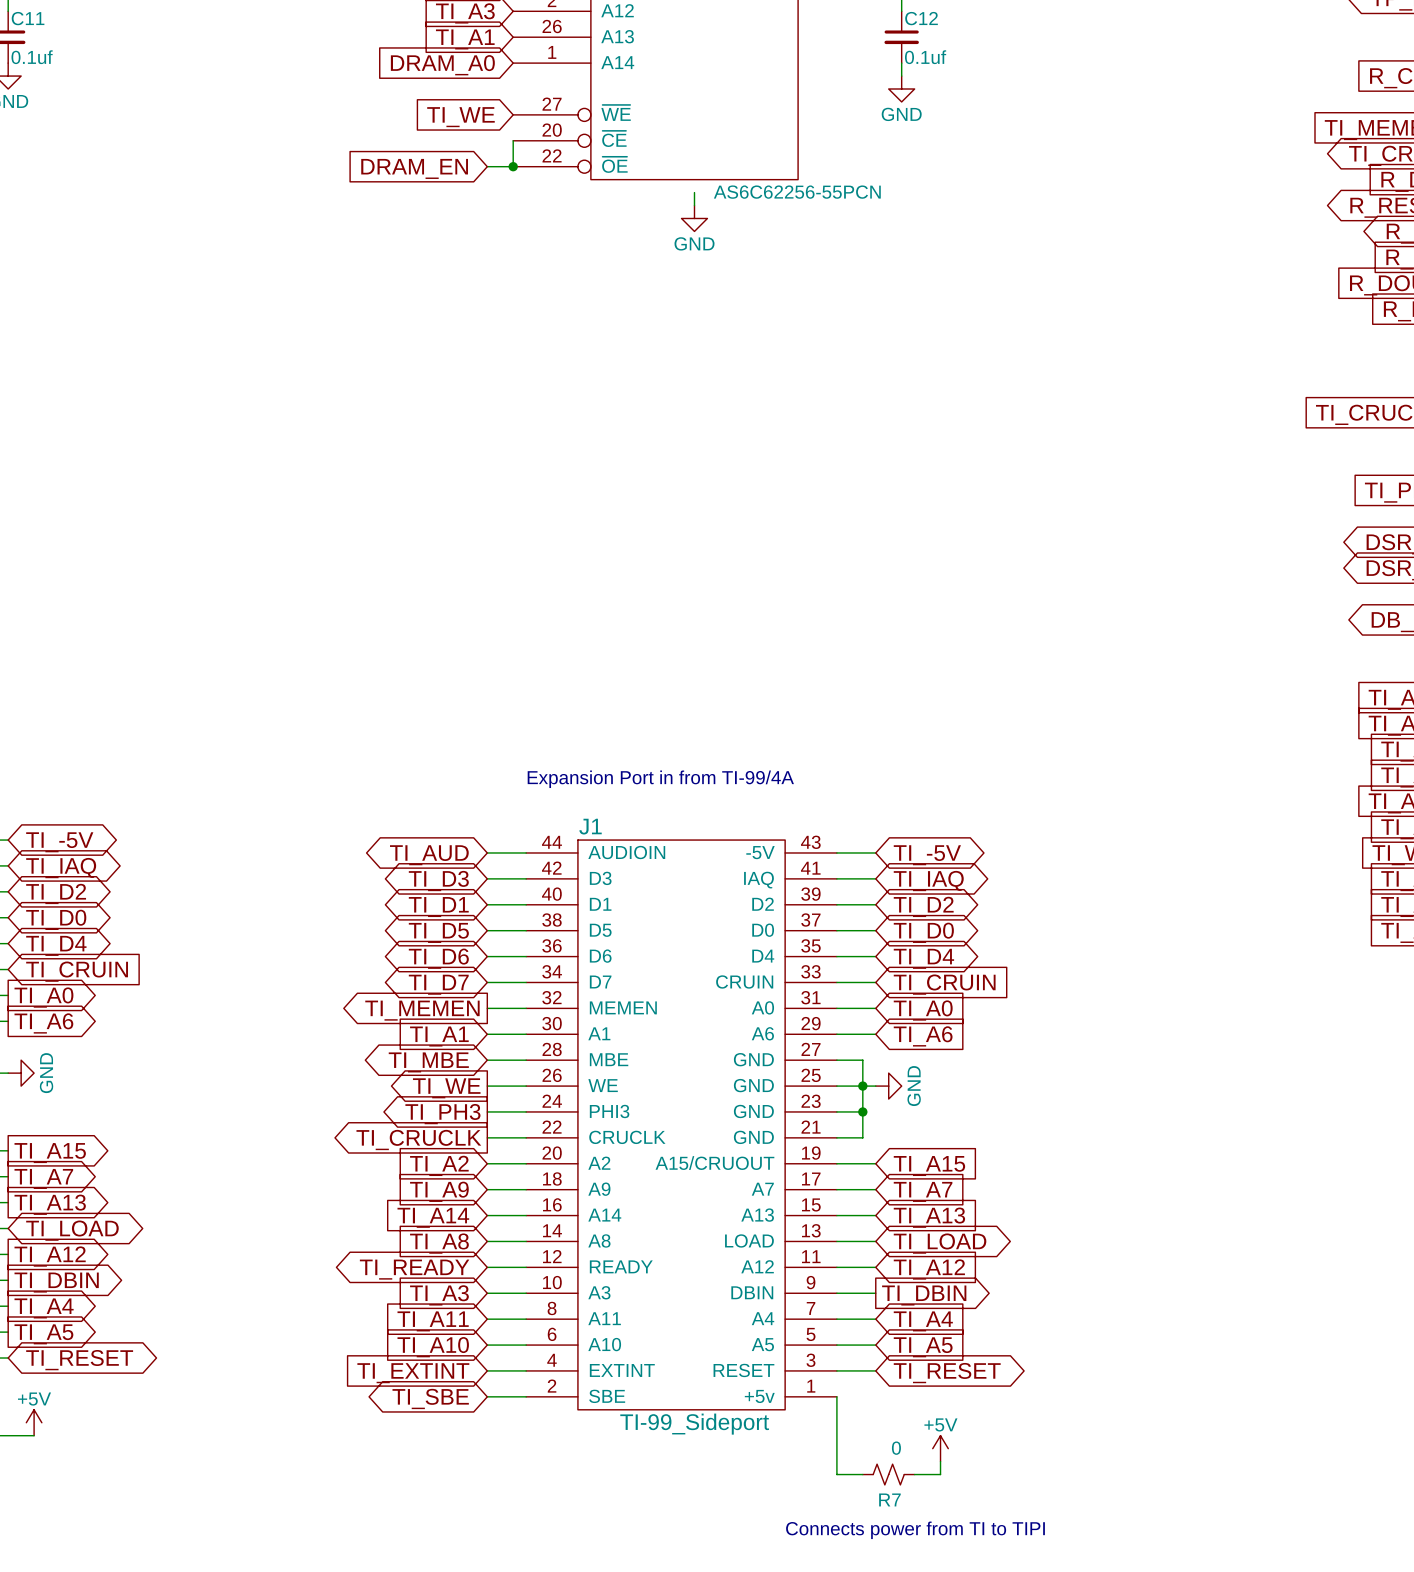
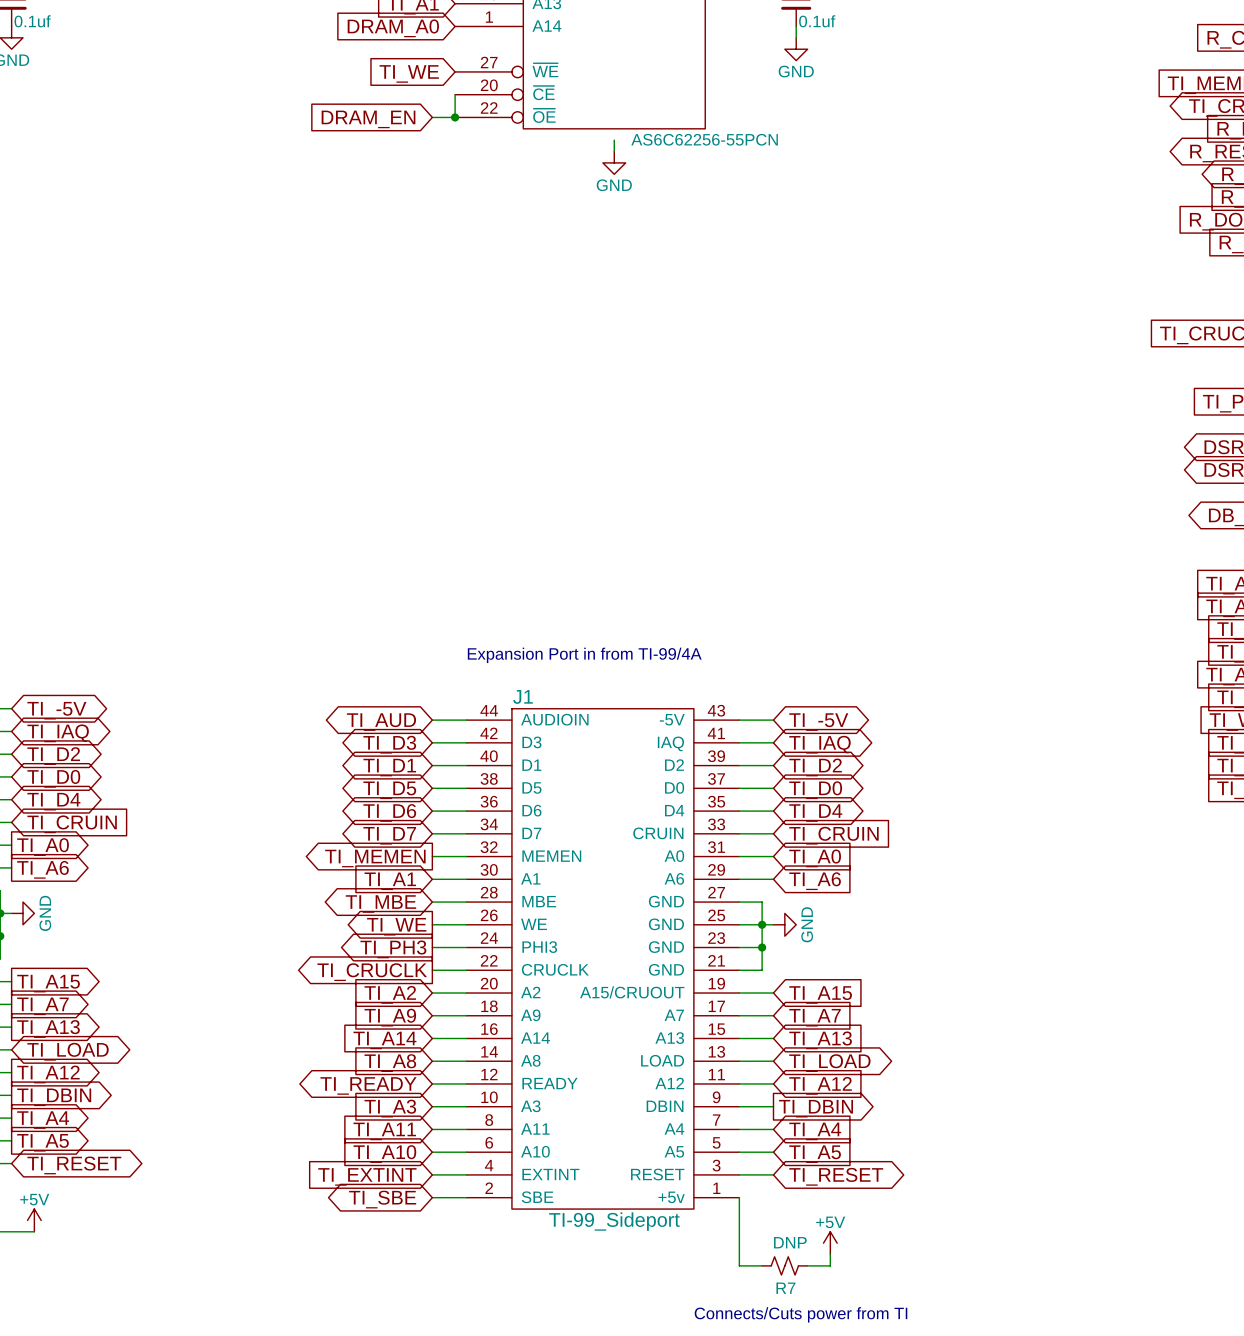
R7 value: 0 (896, 1448) -> DNP (790, 1242)
text: Connects power from TI to TIPI (915, 1530) -> Connects/Cuts power from TI (801, 1314)

